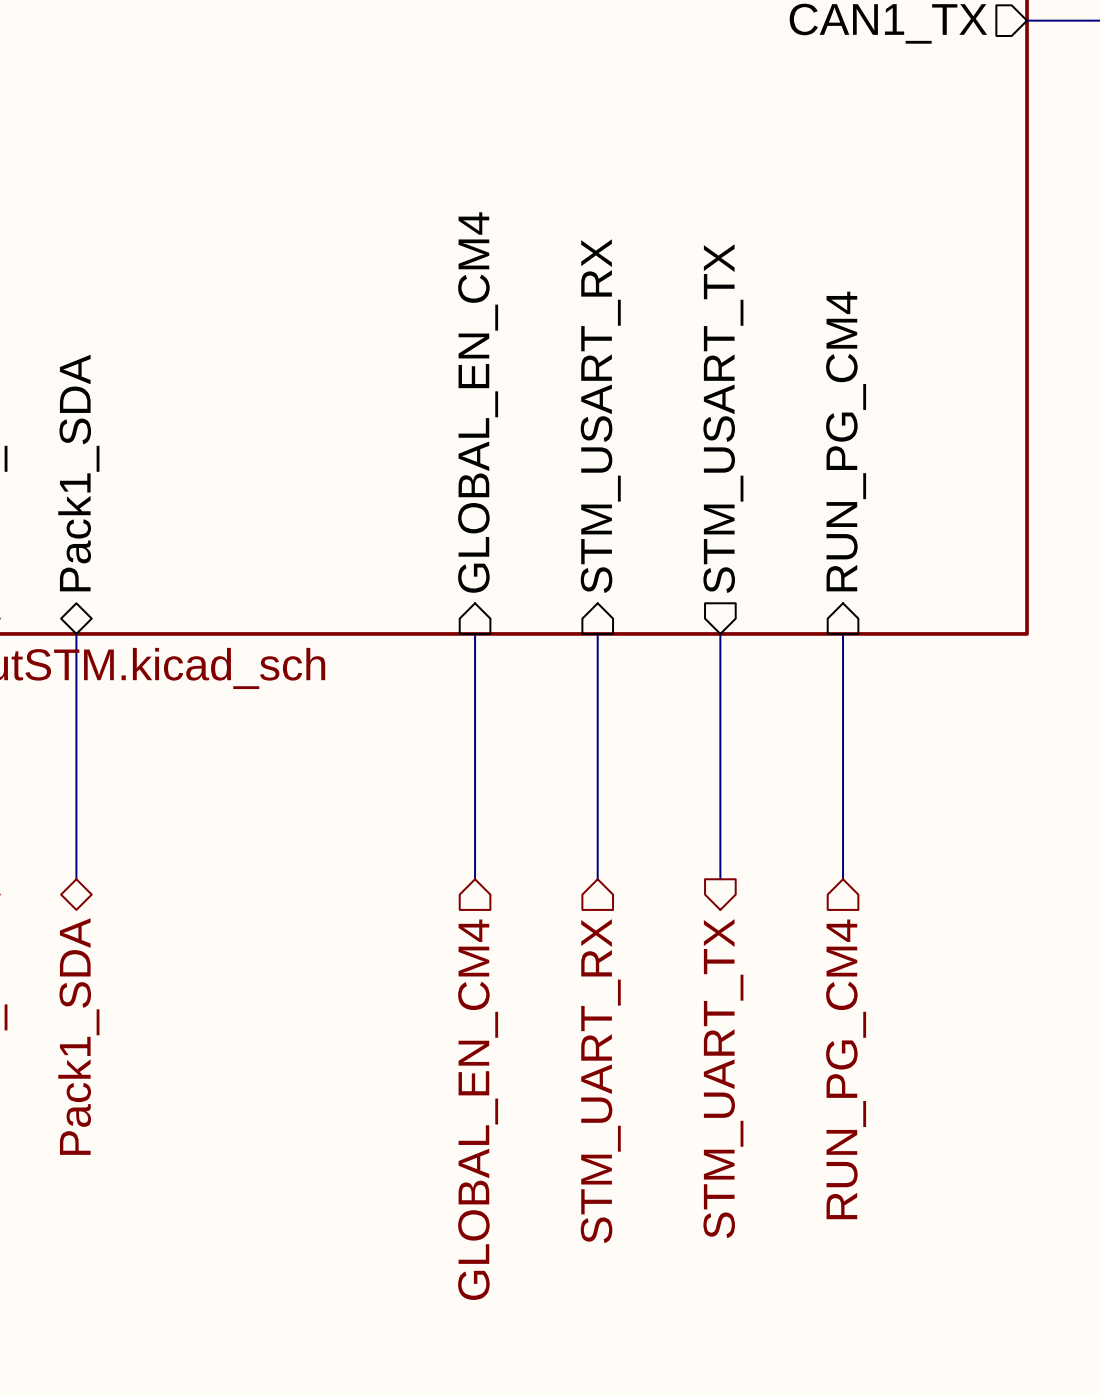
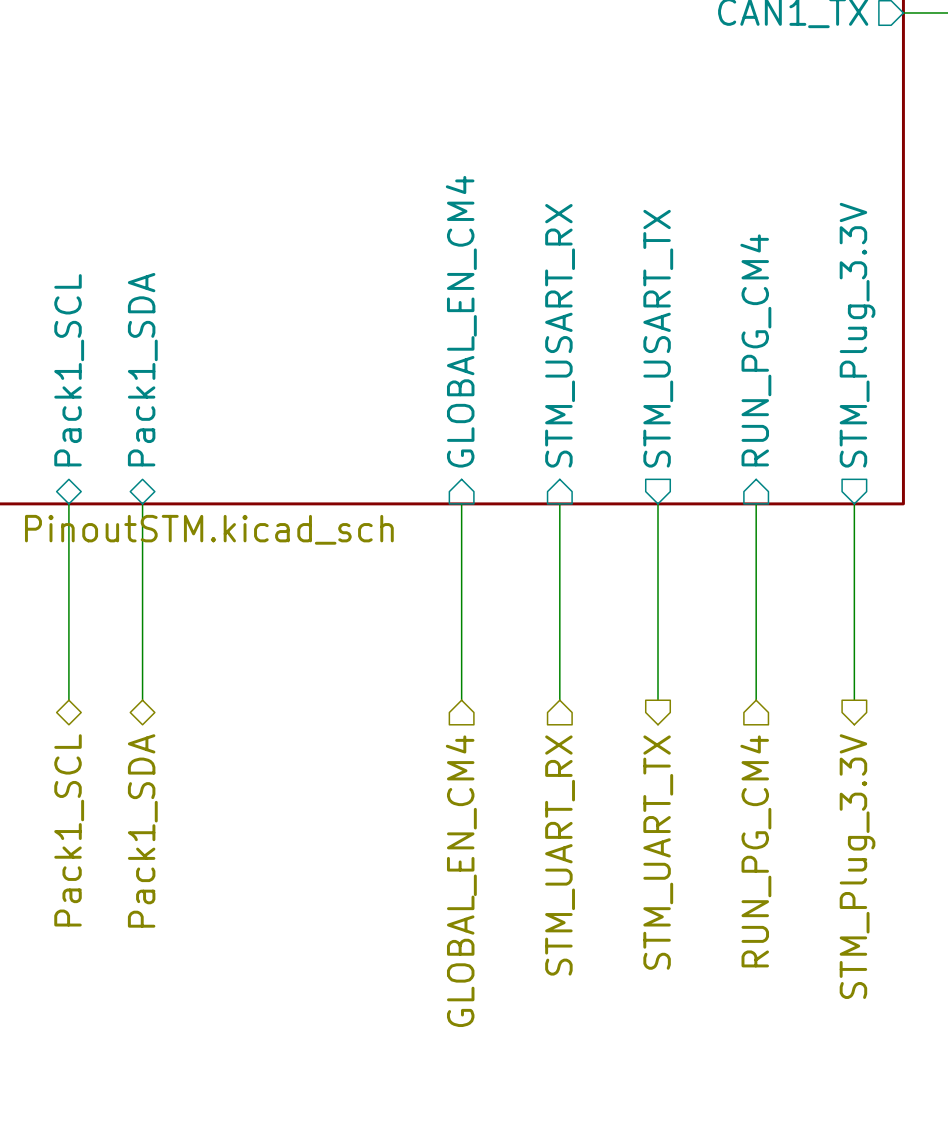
sheet pin: none -> STM_Plug_3.3V (857, 335)
wire: none -> (854, 503) (854, 700)
hierarchical label: none -> STM_Plug_3.3V (857, 866)

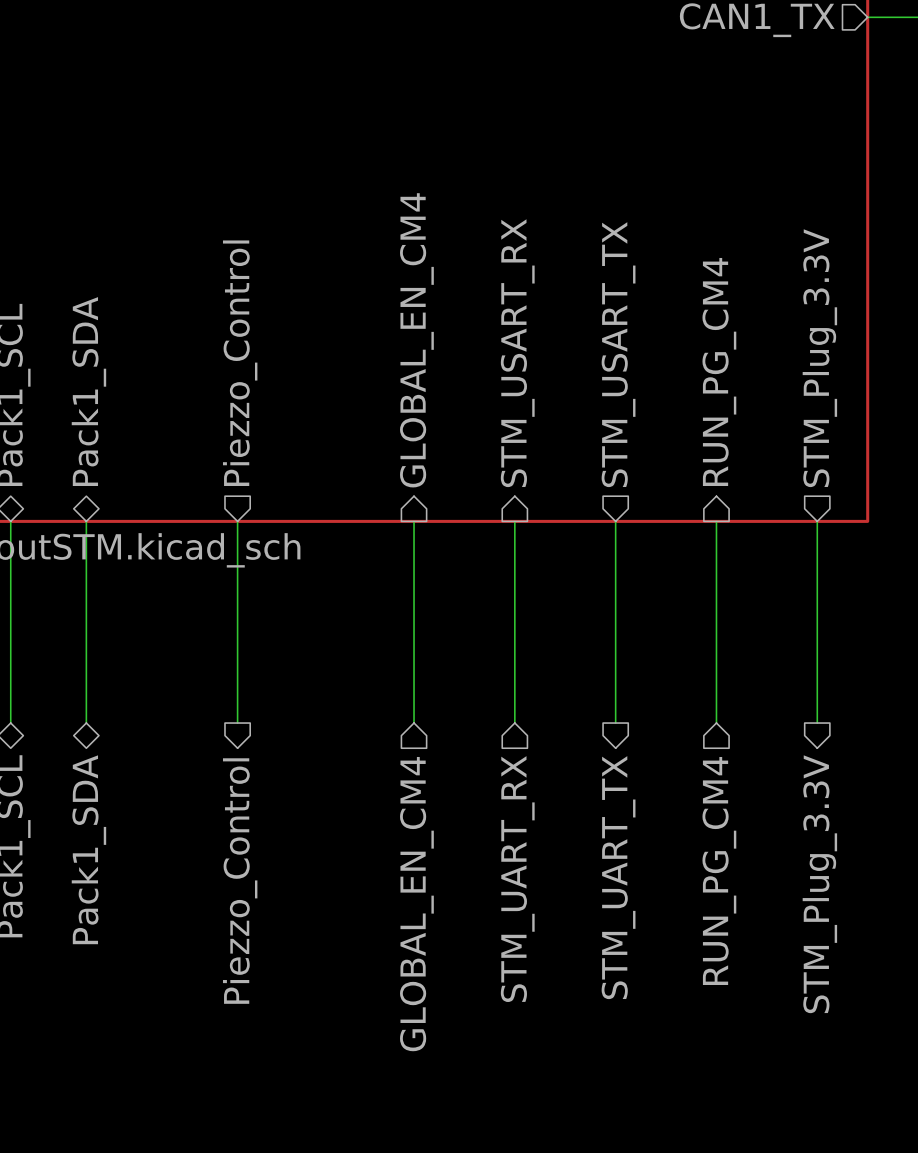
sheet pin: none -> Piezzo_Control (240, 363)
wire: none -> (237, 521) (237, 723)
hierarchical label: none -> Piezzo_Control (240, 881)

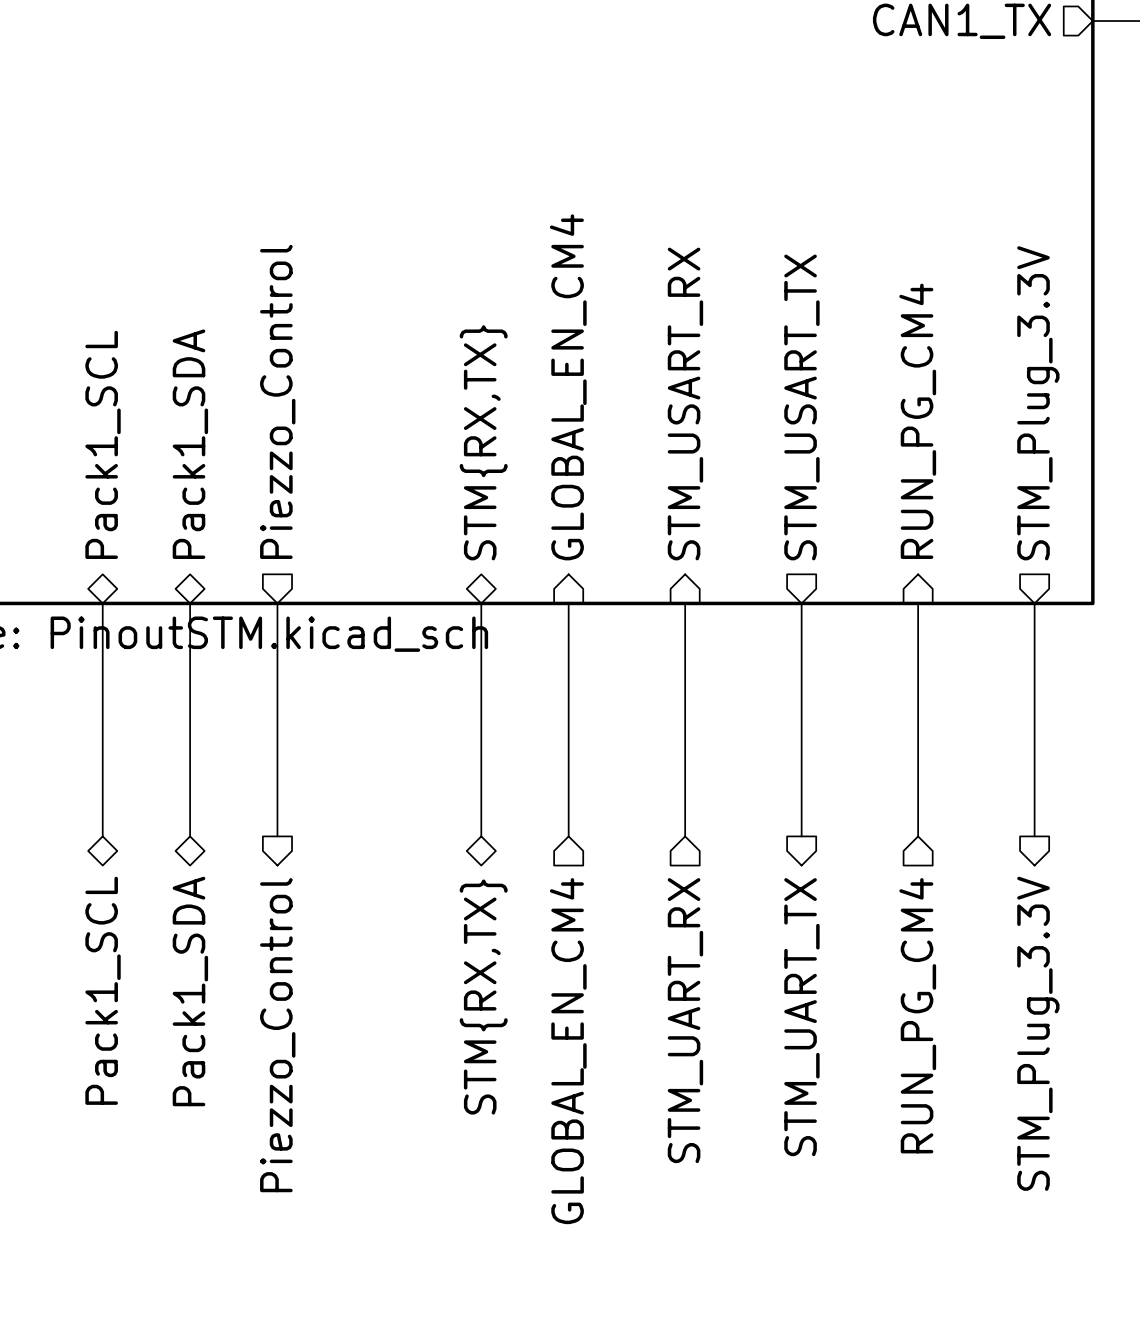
sheet pin position: Piezzo_Control (240, 363) -> Piezzo_Control (277, 401)
sheet pin: none -> STM{RX,TX} (483, 442)
wire: (237, 521) (237, 723) -> (277, 603) (277, 836)
bus: none -> (481, 603) (481, 836)
hierarchical label: none -> STM{RX,TX} (483, 997)
hierarchical label position: Piezzo_Control (240, 881) -> Piezzo_Control (277, 1035)

